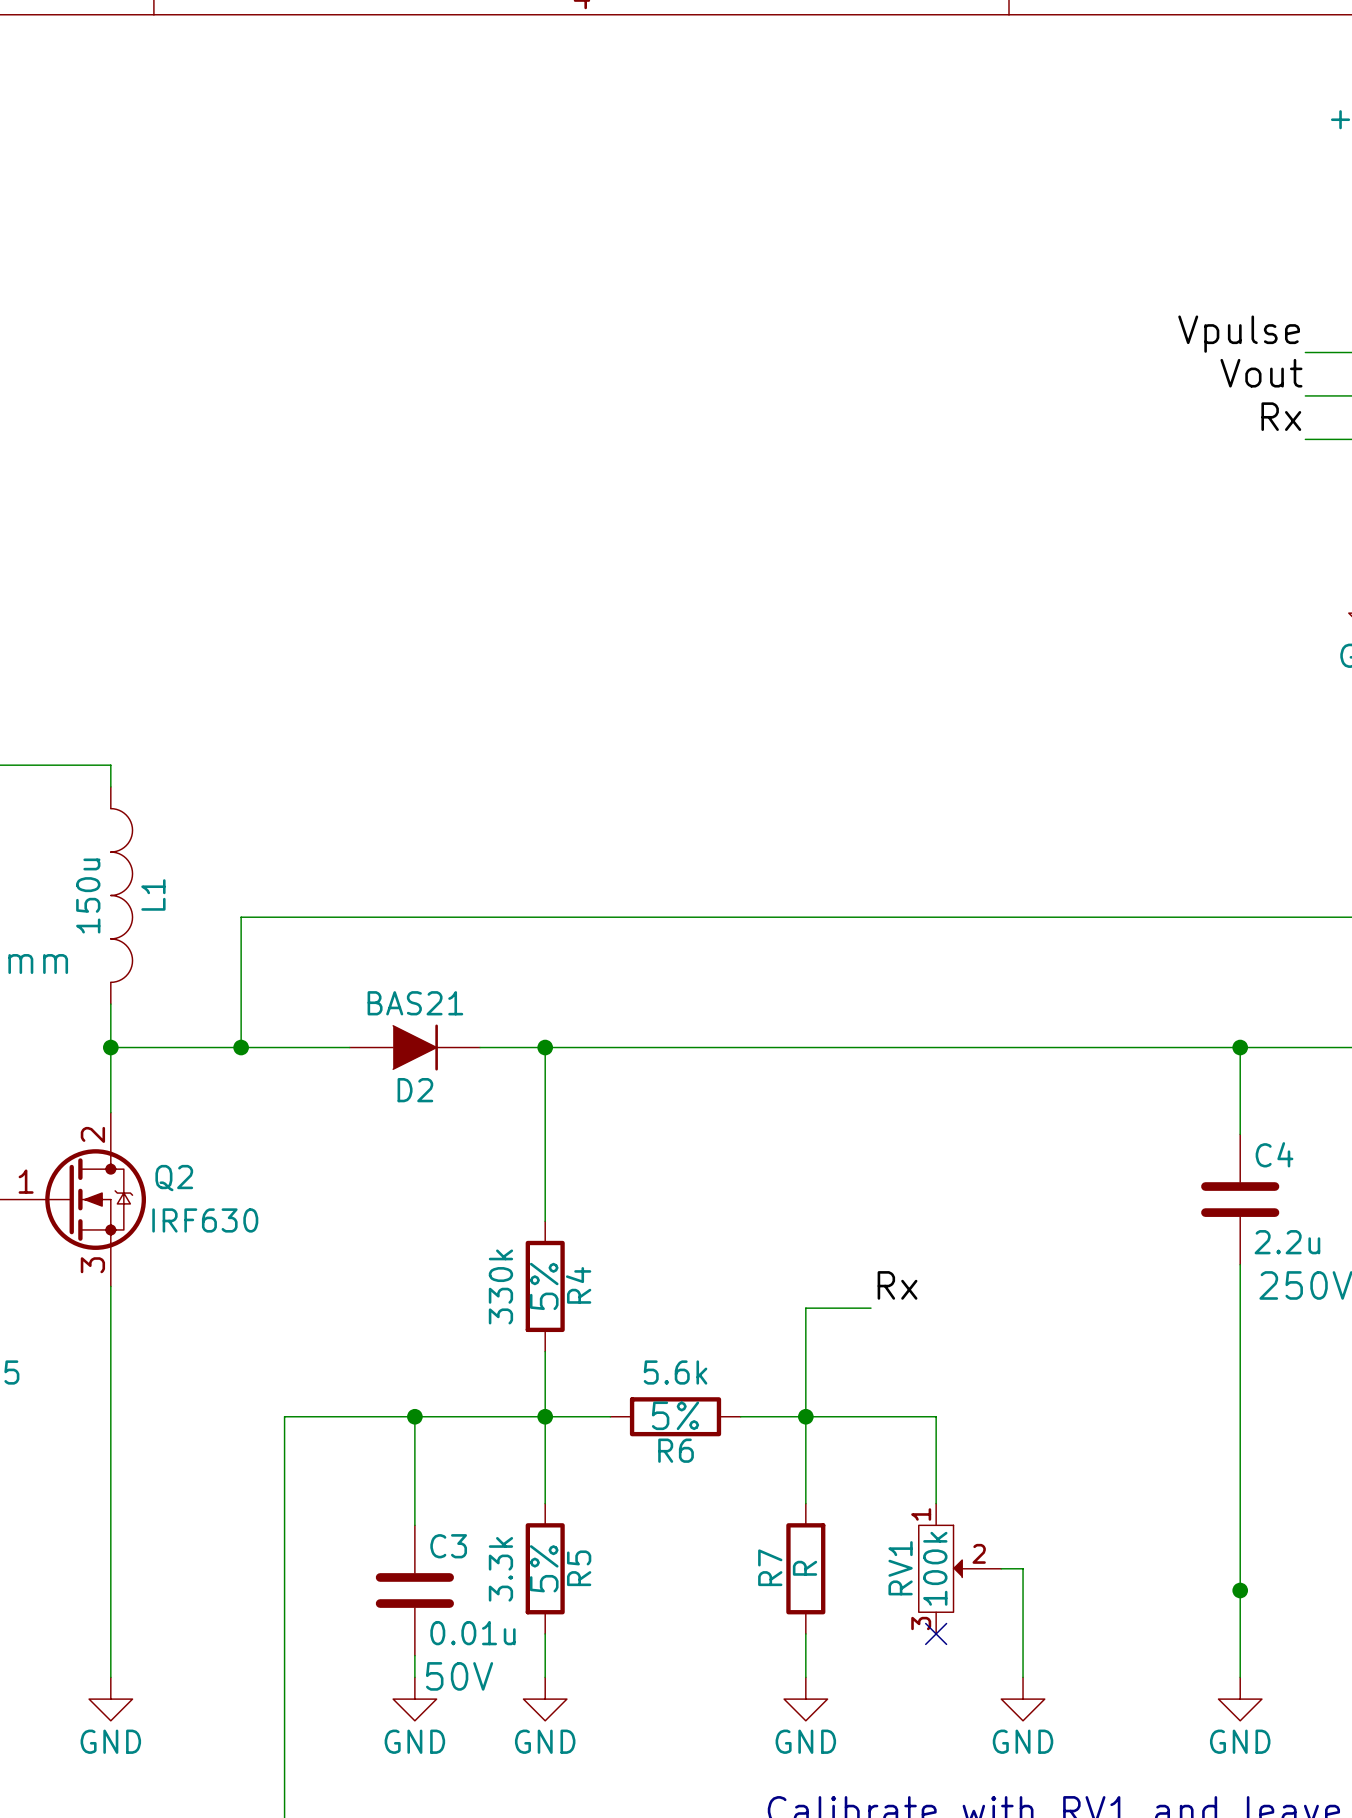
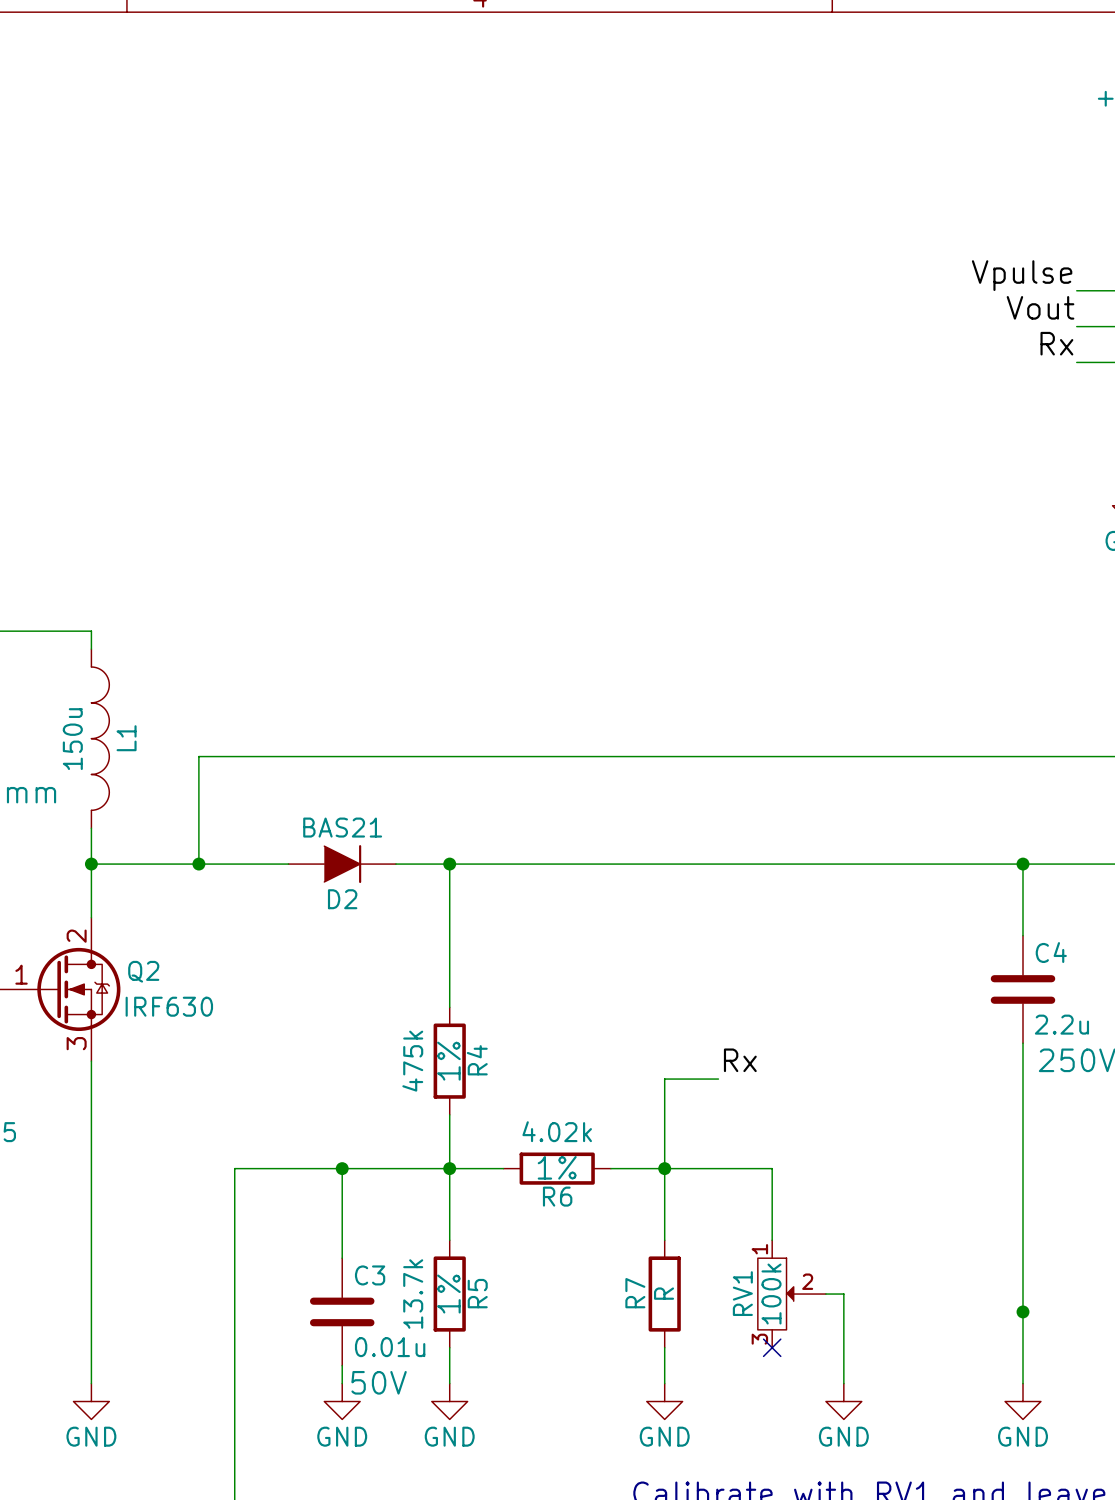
R4 value: 330k (500, 1286) -> 475k (412, 1061)
R4 text: 5% (544, 1286) -> 1% (448, 1061)
R6 value: 5.6k (675, 1372) -> 4.02k (557, 1131)
R6 text: 5% (675, 1415) -> 1% (557, 1167)
R5 text: 5% (544, 1568) -> 1% (448, 1294)
R5 value: 3.3k (500, 1569) -> 13.7k (413, 1294)

